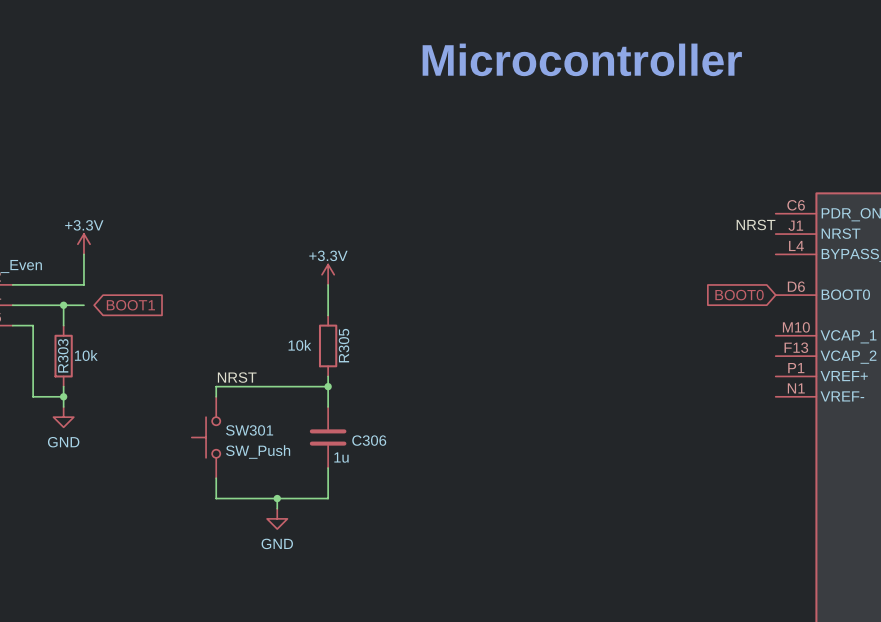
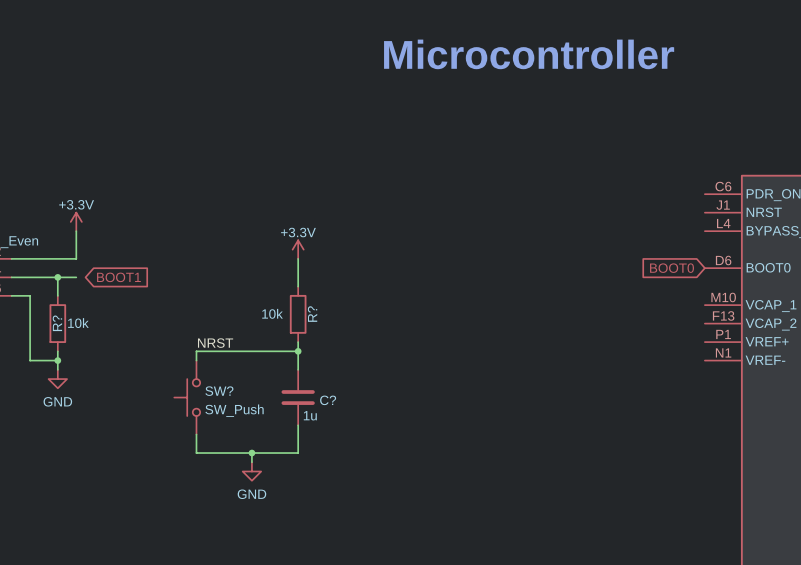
label: NRST (756, 224) -> none
R305 name: R305 (344, 345) -> R? (312, 314)
R303 name: R303 (63, 355) -> R? (57, 323)
SW301 name: SW301 (249, 430) -> SW? (219, 391)
C306 name: C306 (369, 440) -> C? (328, 400)

